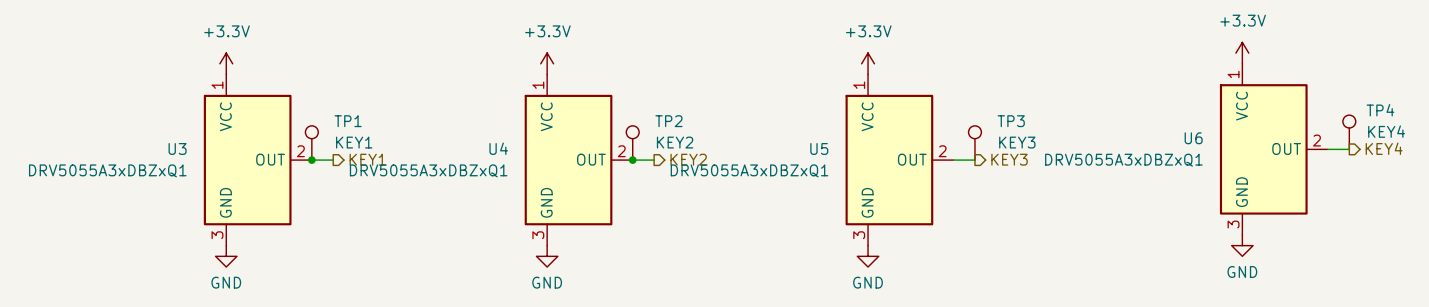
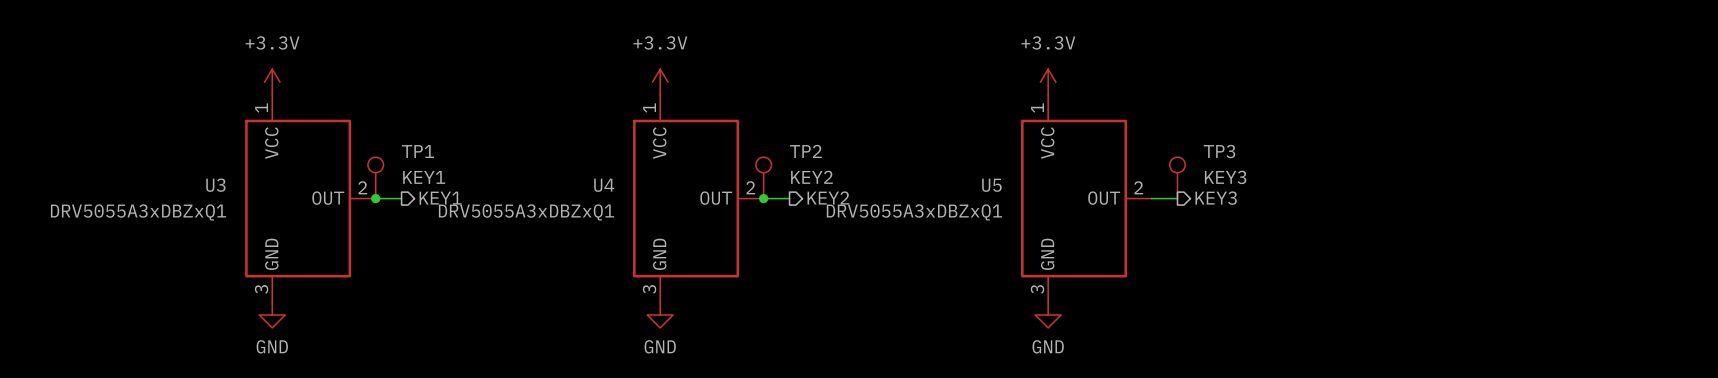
power symbol: +3.3V (1242, 53) -> none
TP4: KEY4 (1349, 132) -> none
hierarchical label: KEY4 (1384, 148) -> none
U6: DRV5055A3xDBZxQ1 (1273, 149) -> none
wire: (1327, 149) (1349, 149) -> none
power symbol: GND (1242, 245) -> none

